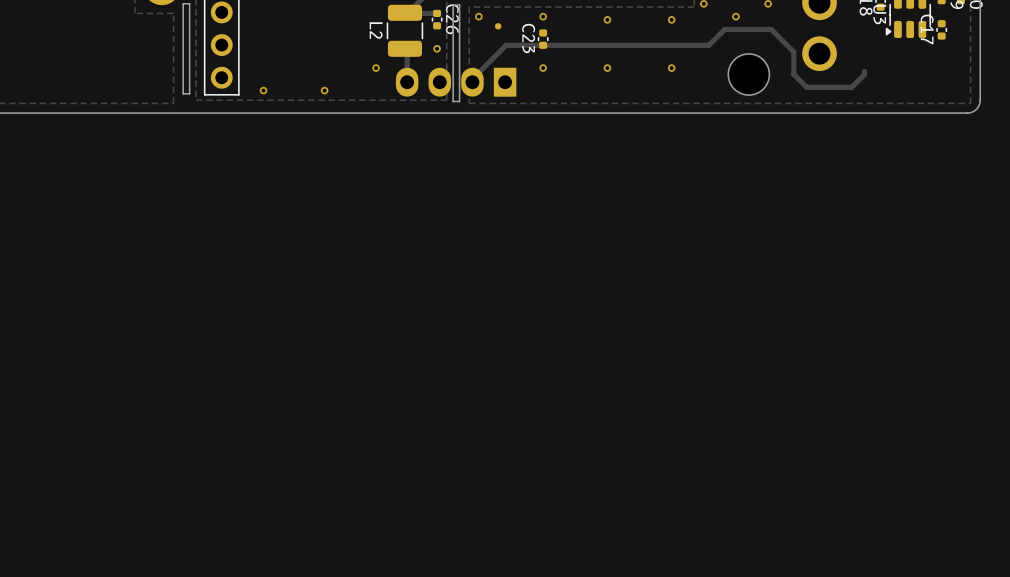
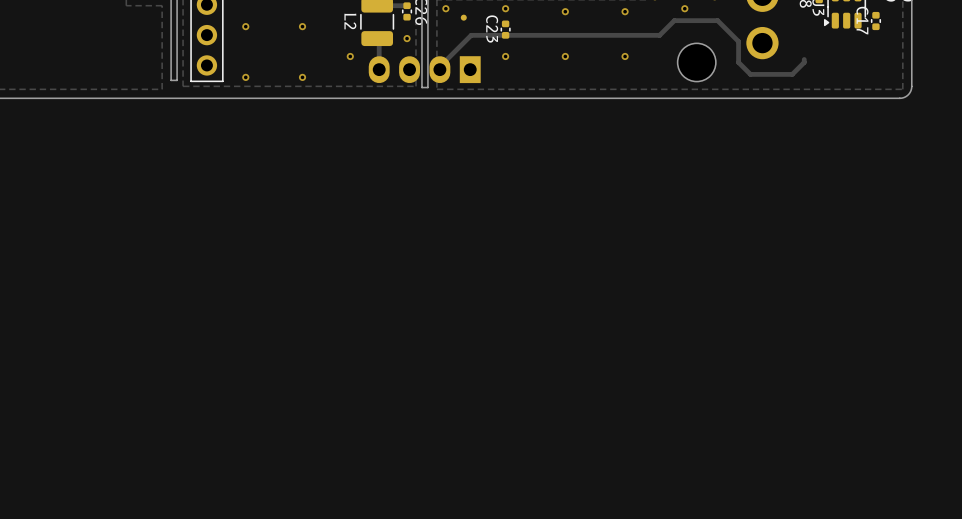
via: none -> (245, 26)
via: none -> (302, 26)

